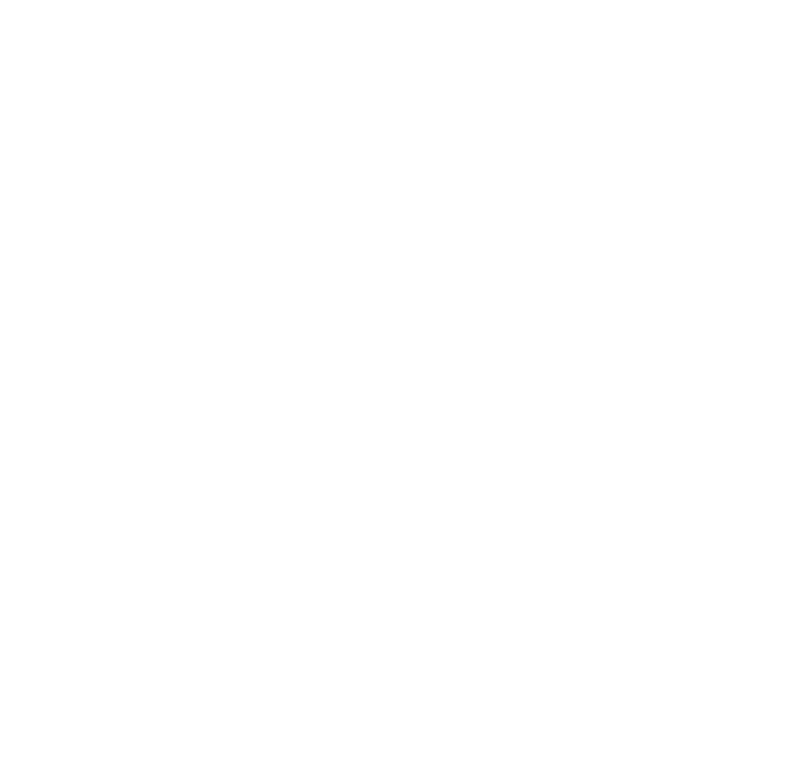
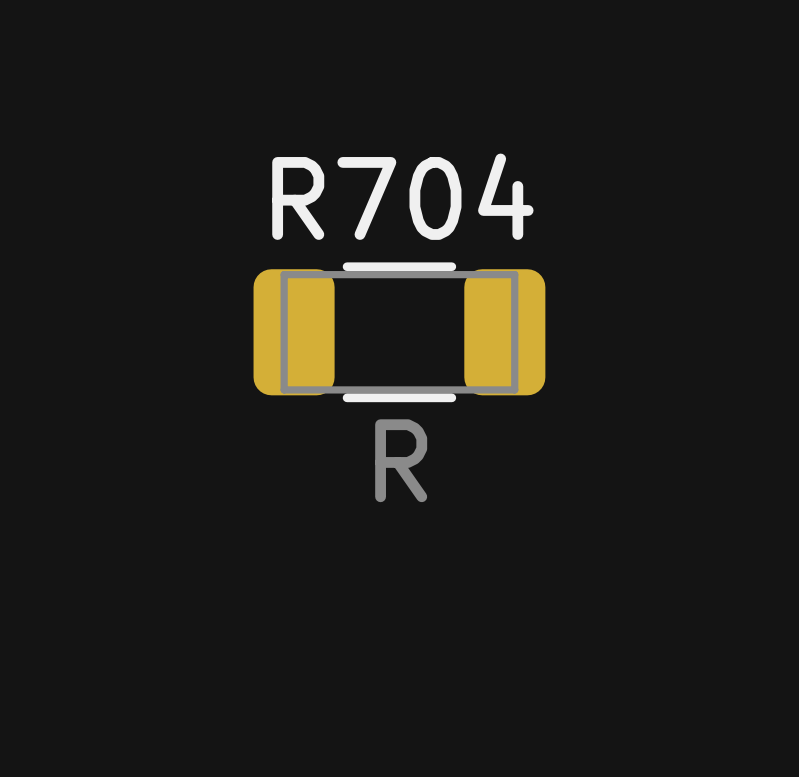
R704: none -> R (399, 332)

